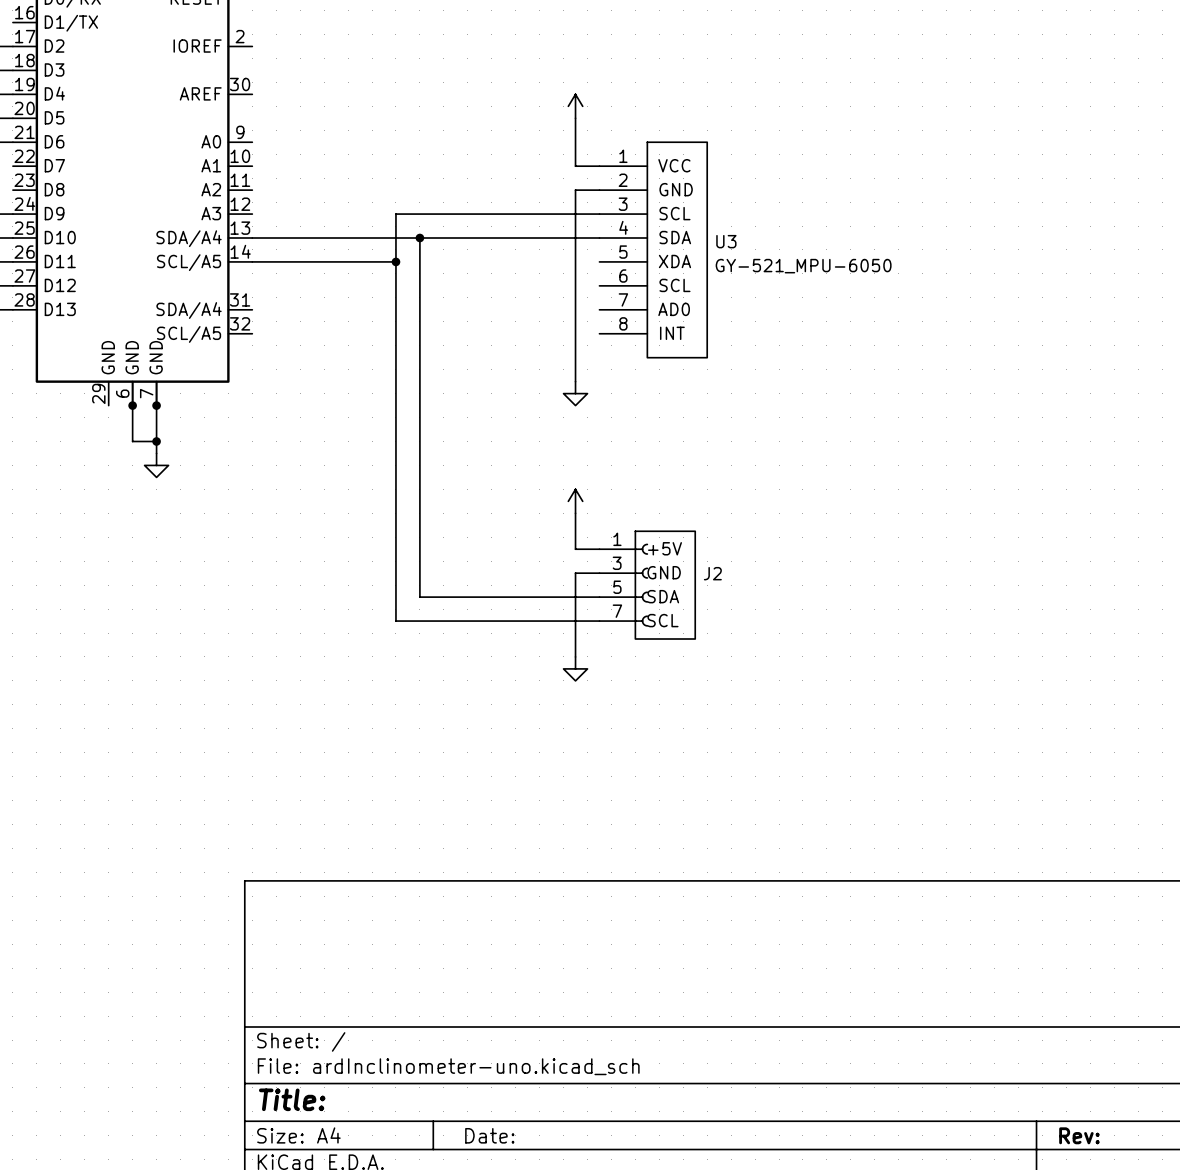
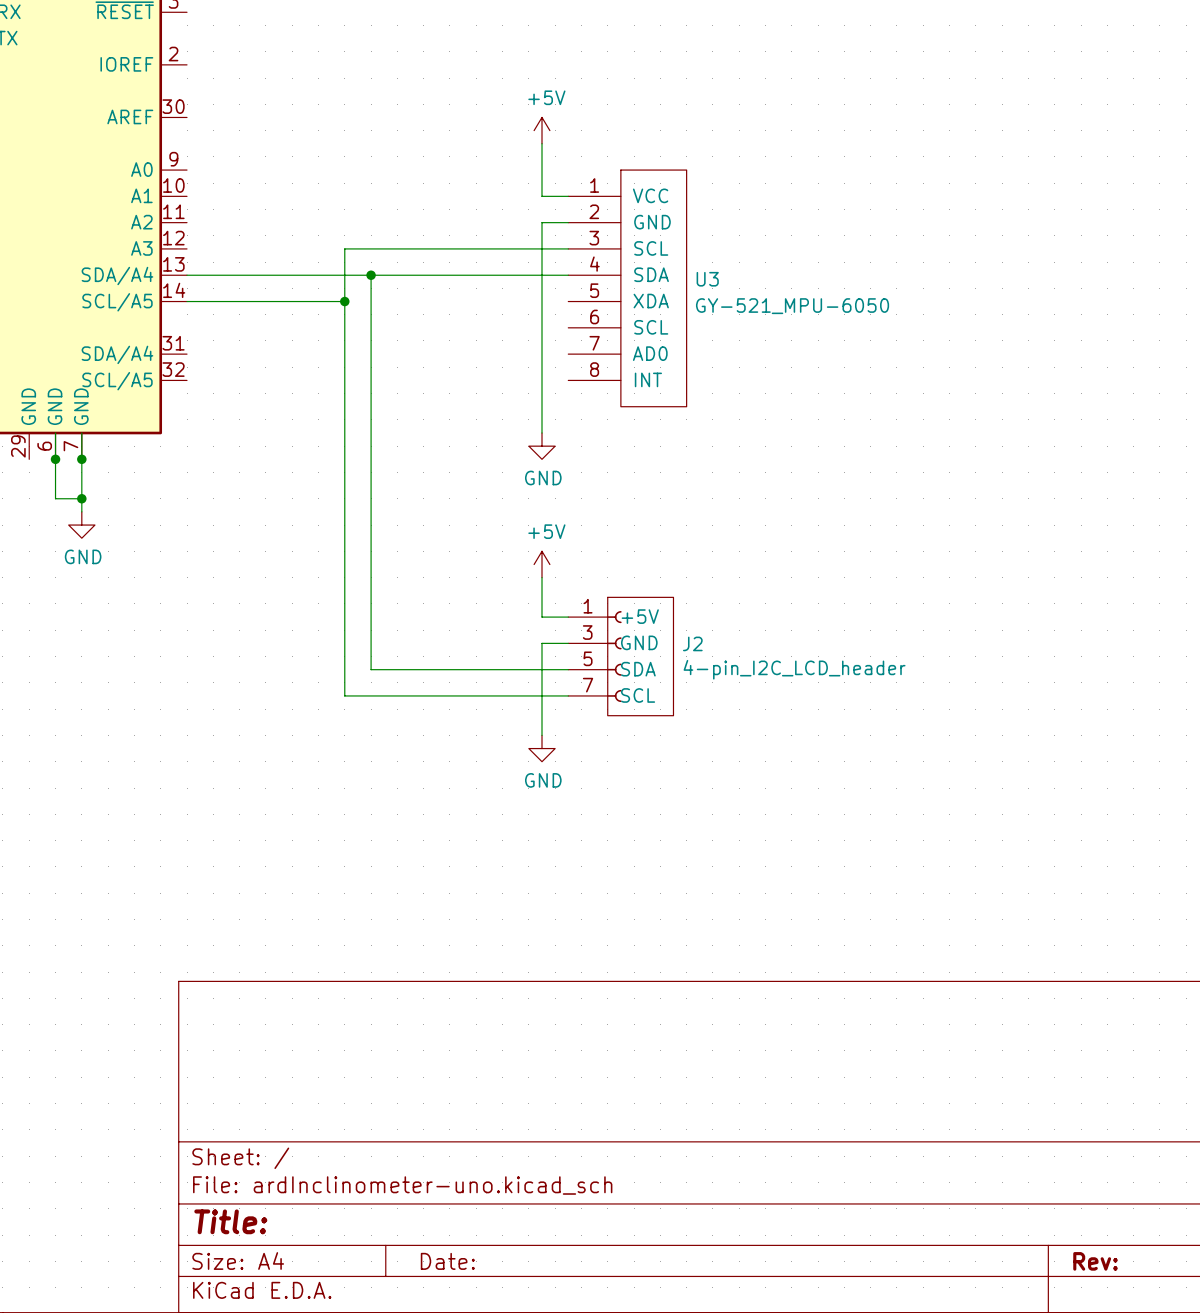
power symbol text: none -> +5V (546, 97)
power symbol text: none -> GND (543, 478)
power symbol text: none -> +5V (546, 531)
power symbol text: none -> GND (83, 556)
J2 value: none -> 4-pin_I2C_LCD_header (794, 669)
power symbol text: none -> GND (543, 780)

